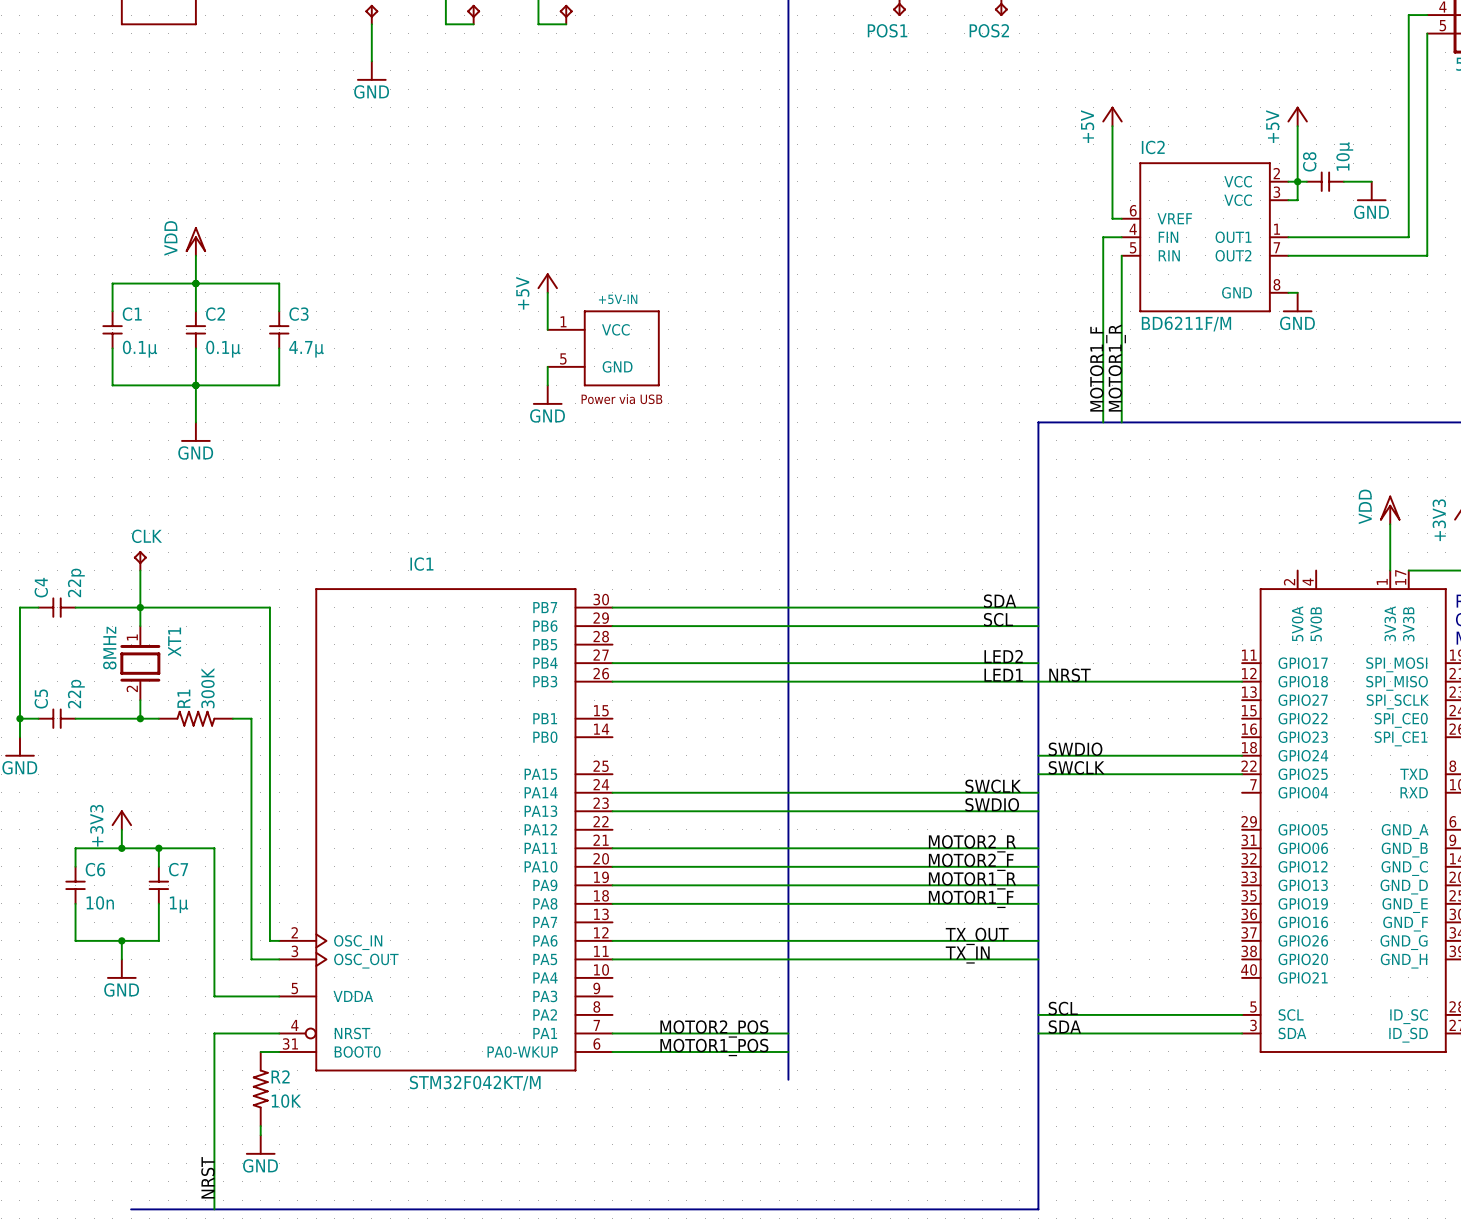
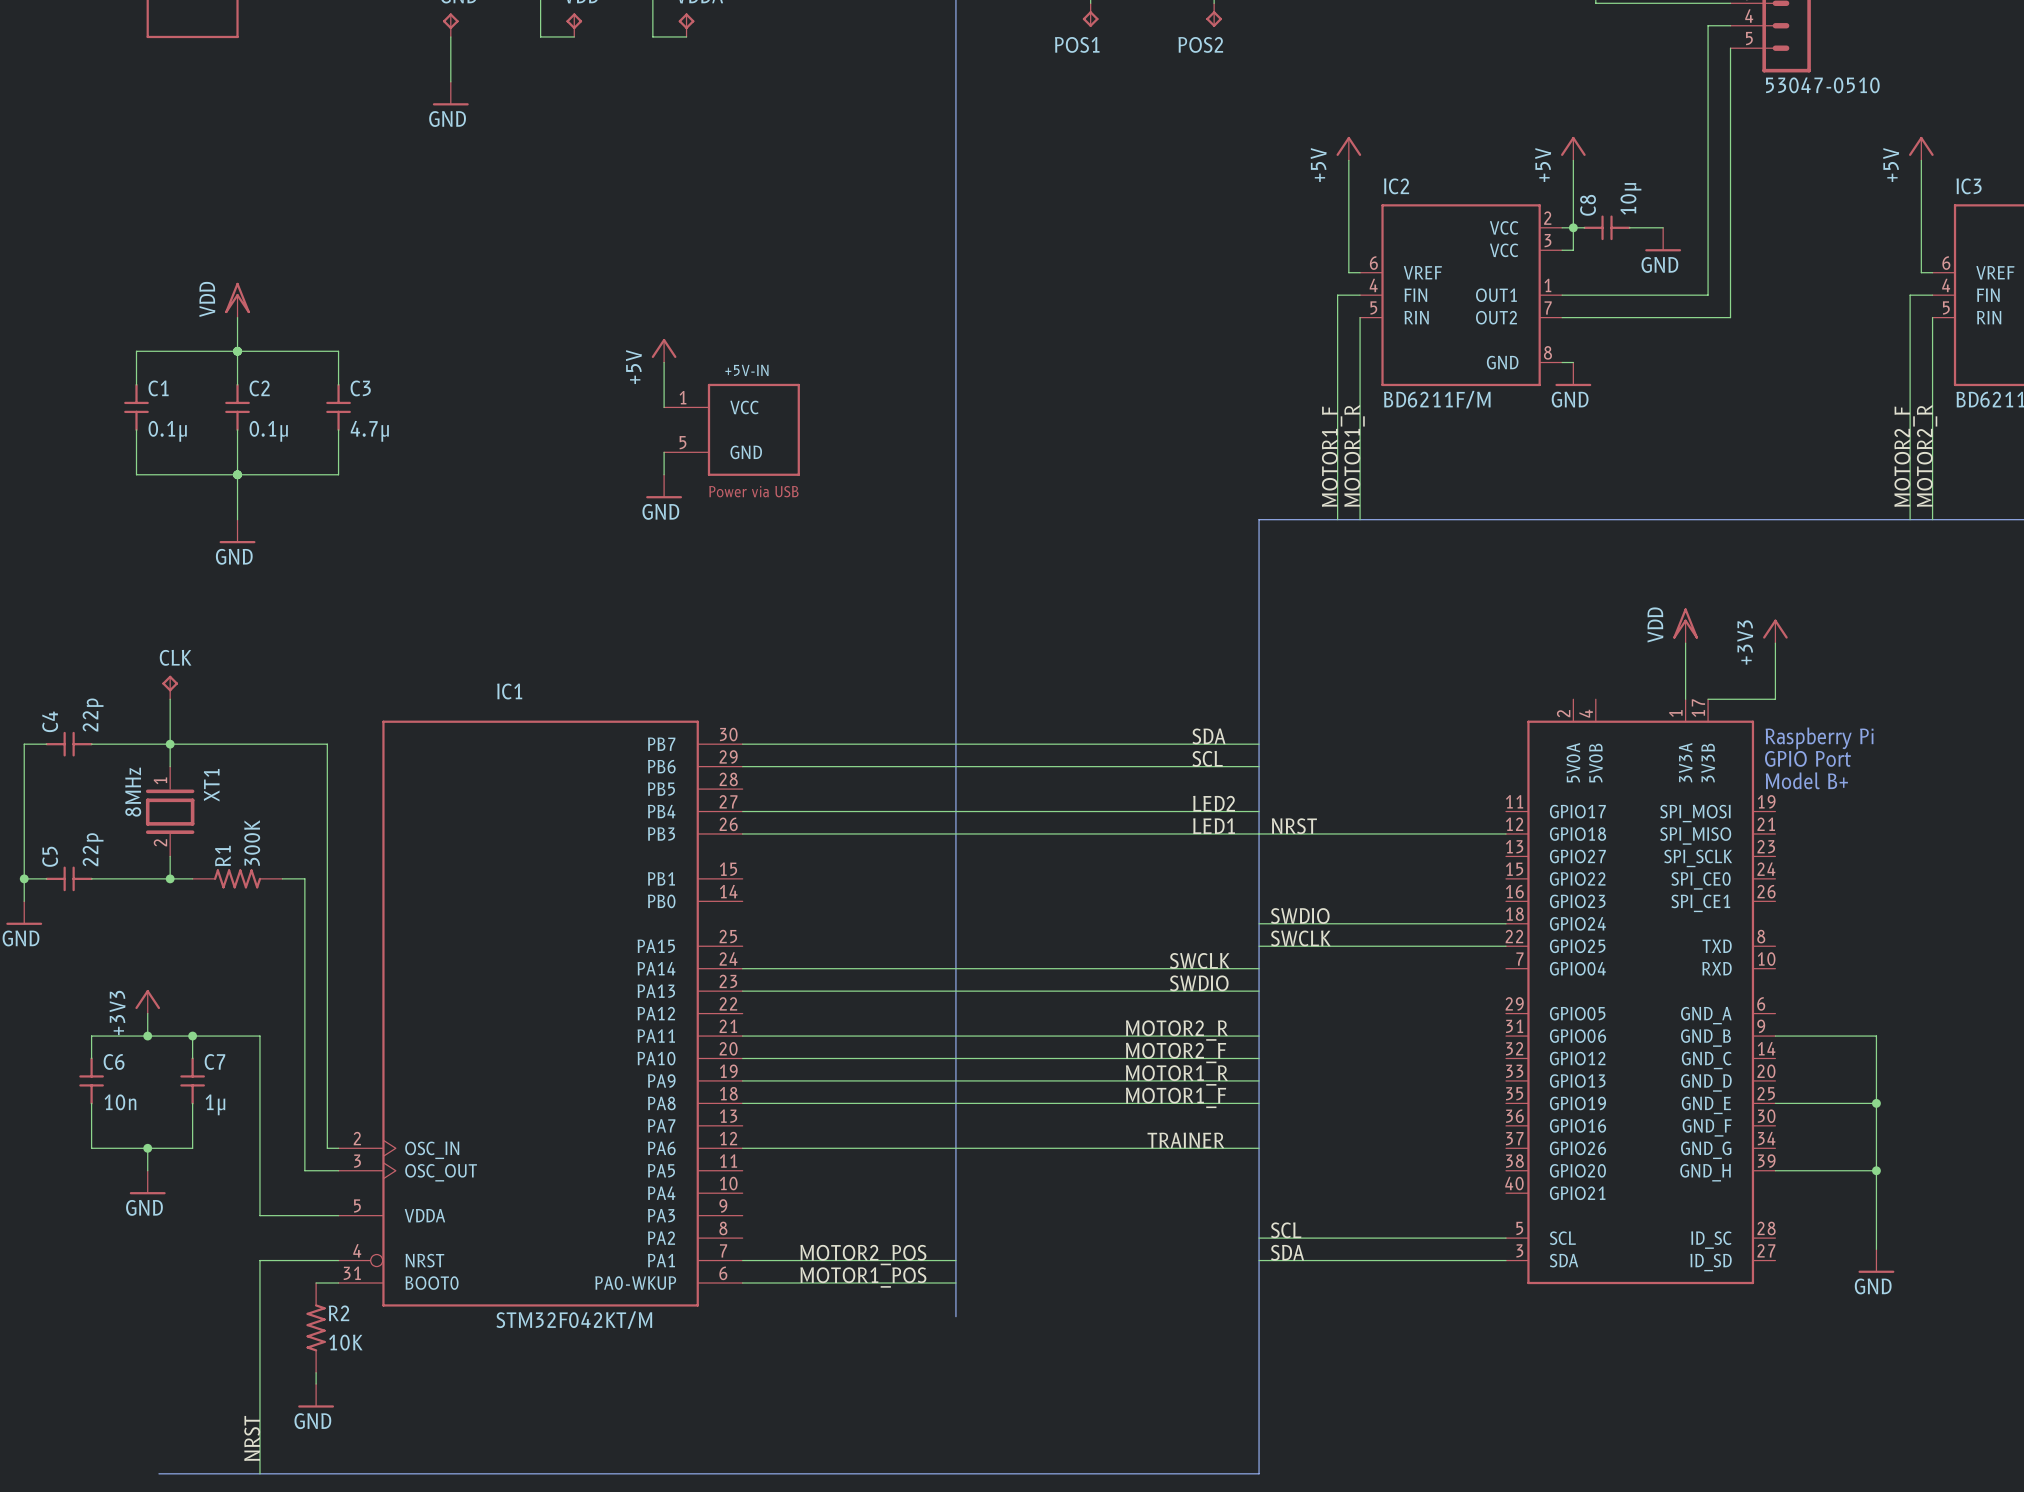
label: TX_OUT (977, 936) -> TRAINER (1185, 1140)
label: TX_IN (967, 955) -> none
wire: (612, 959) (1038, 959) -> none

